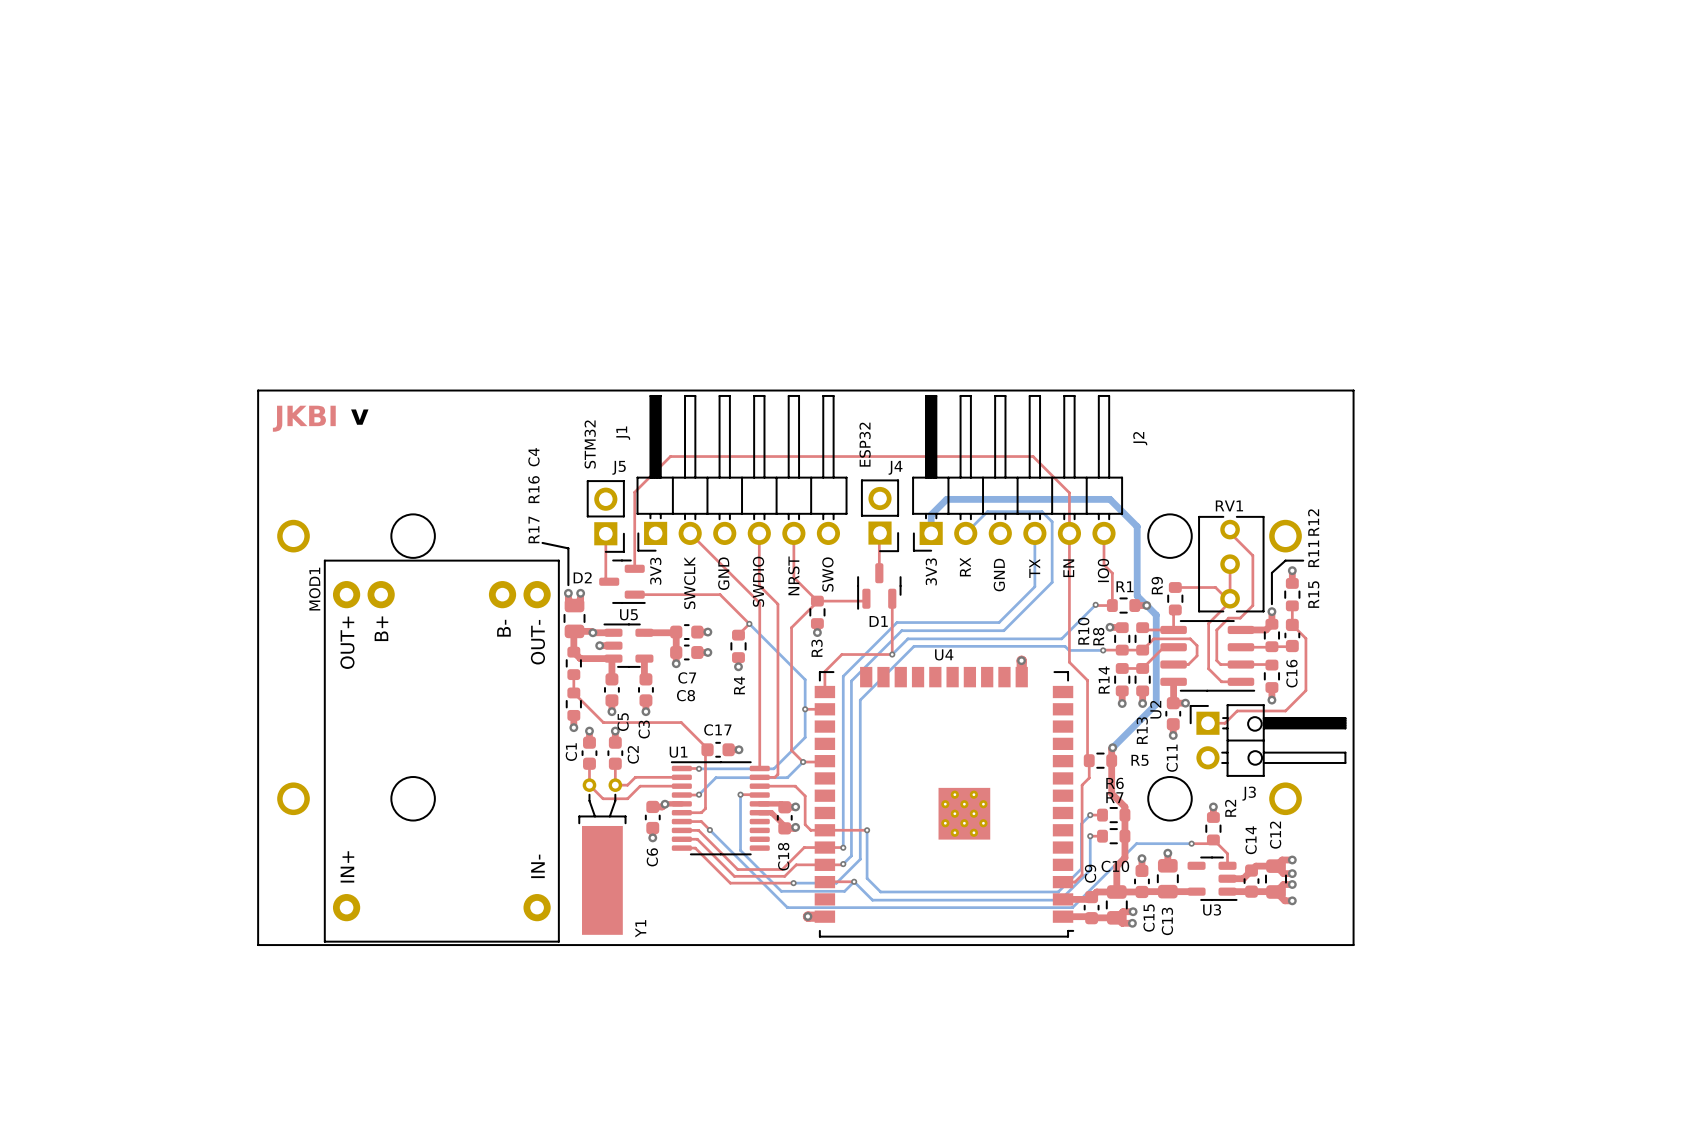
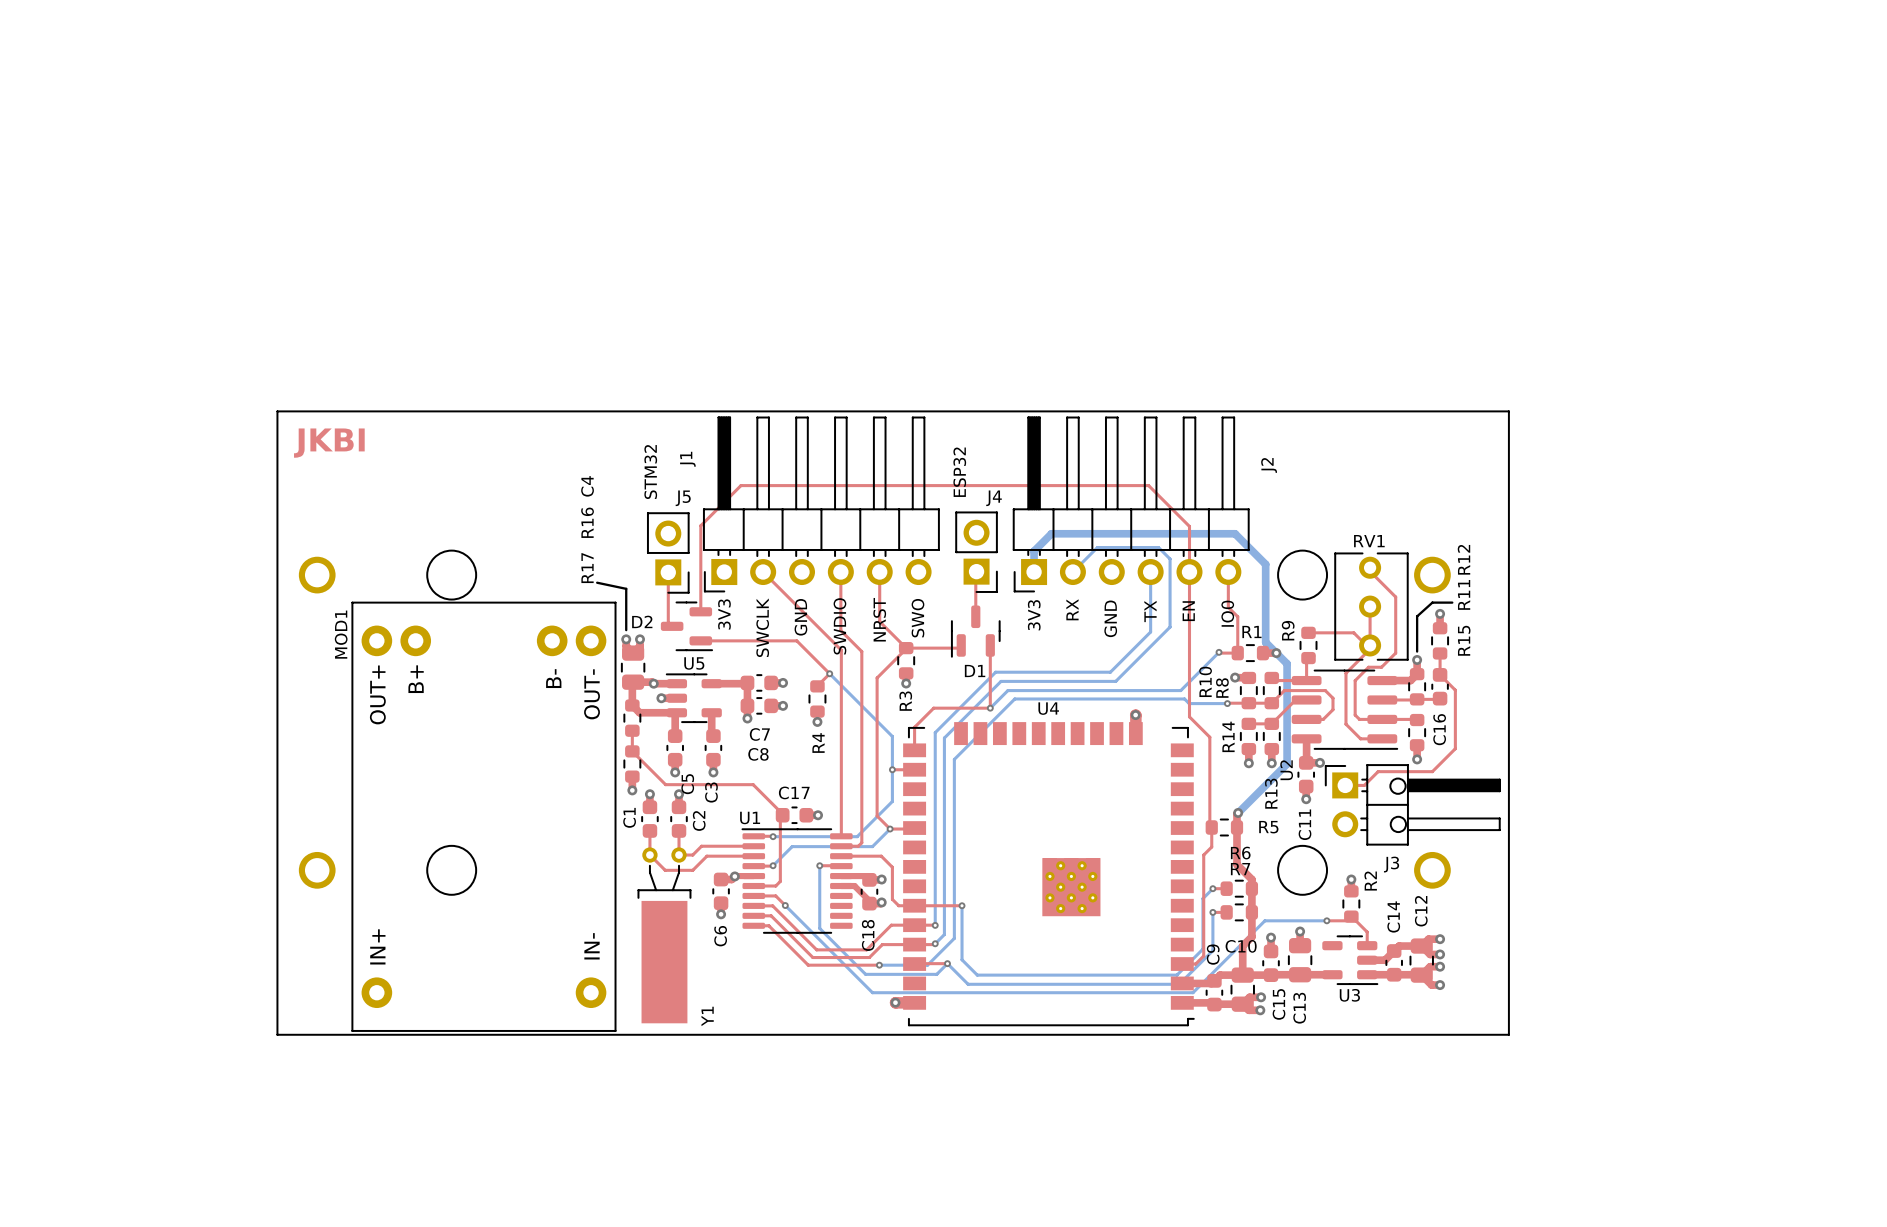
text: v (359, 417) -> none

